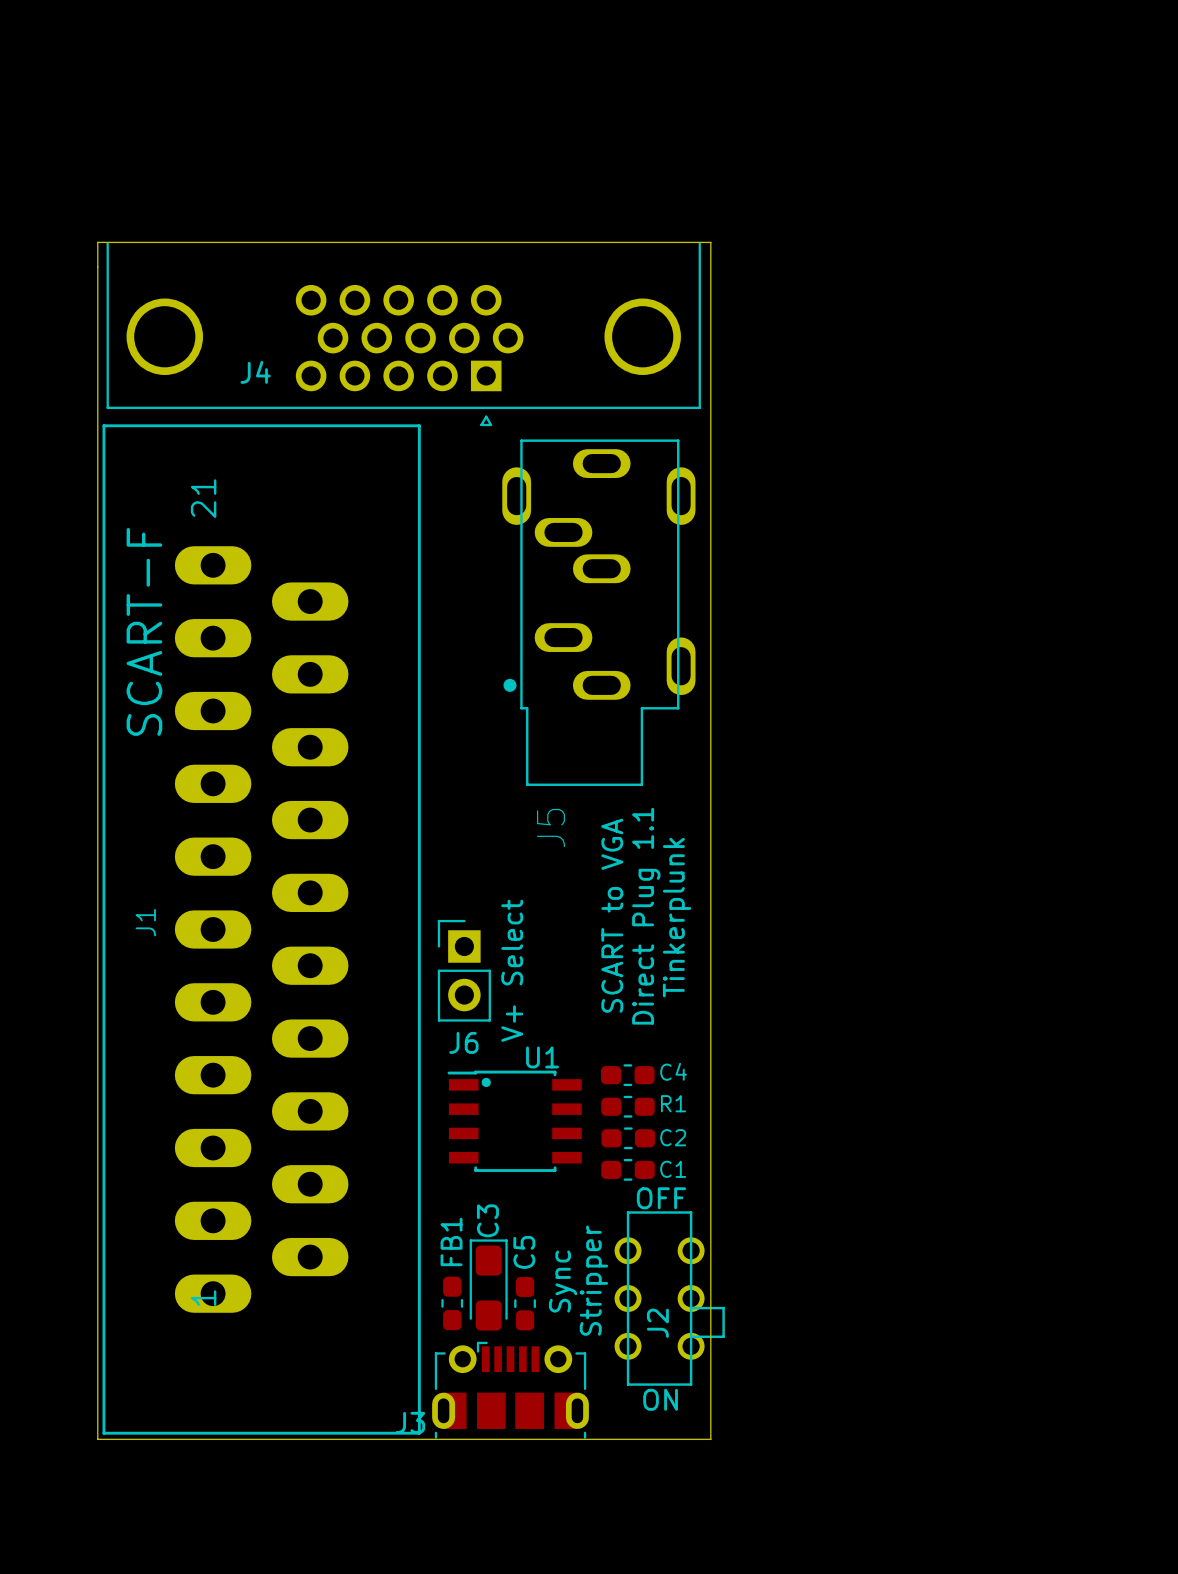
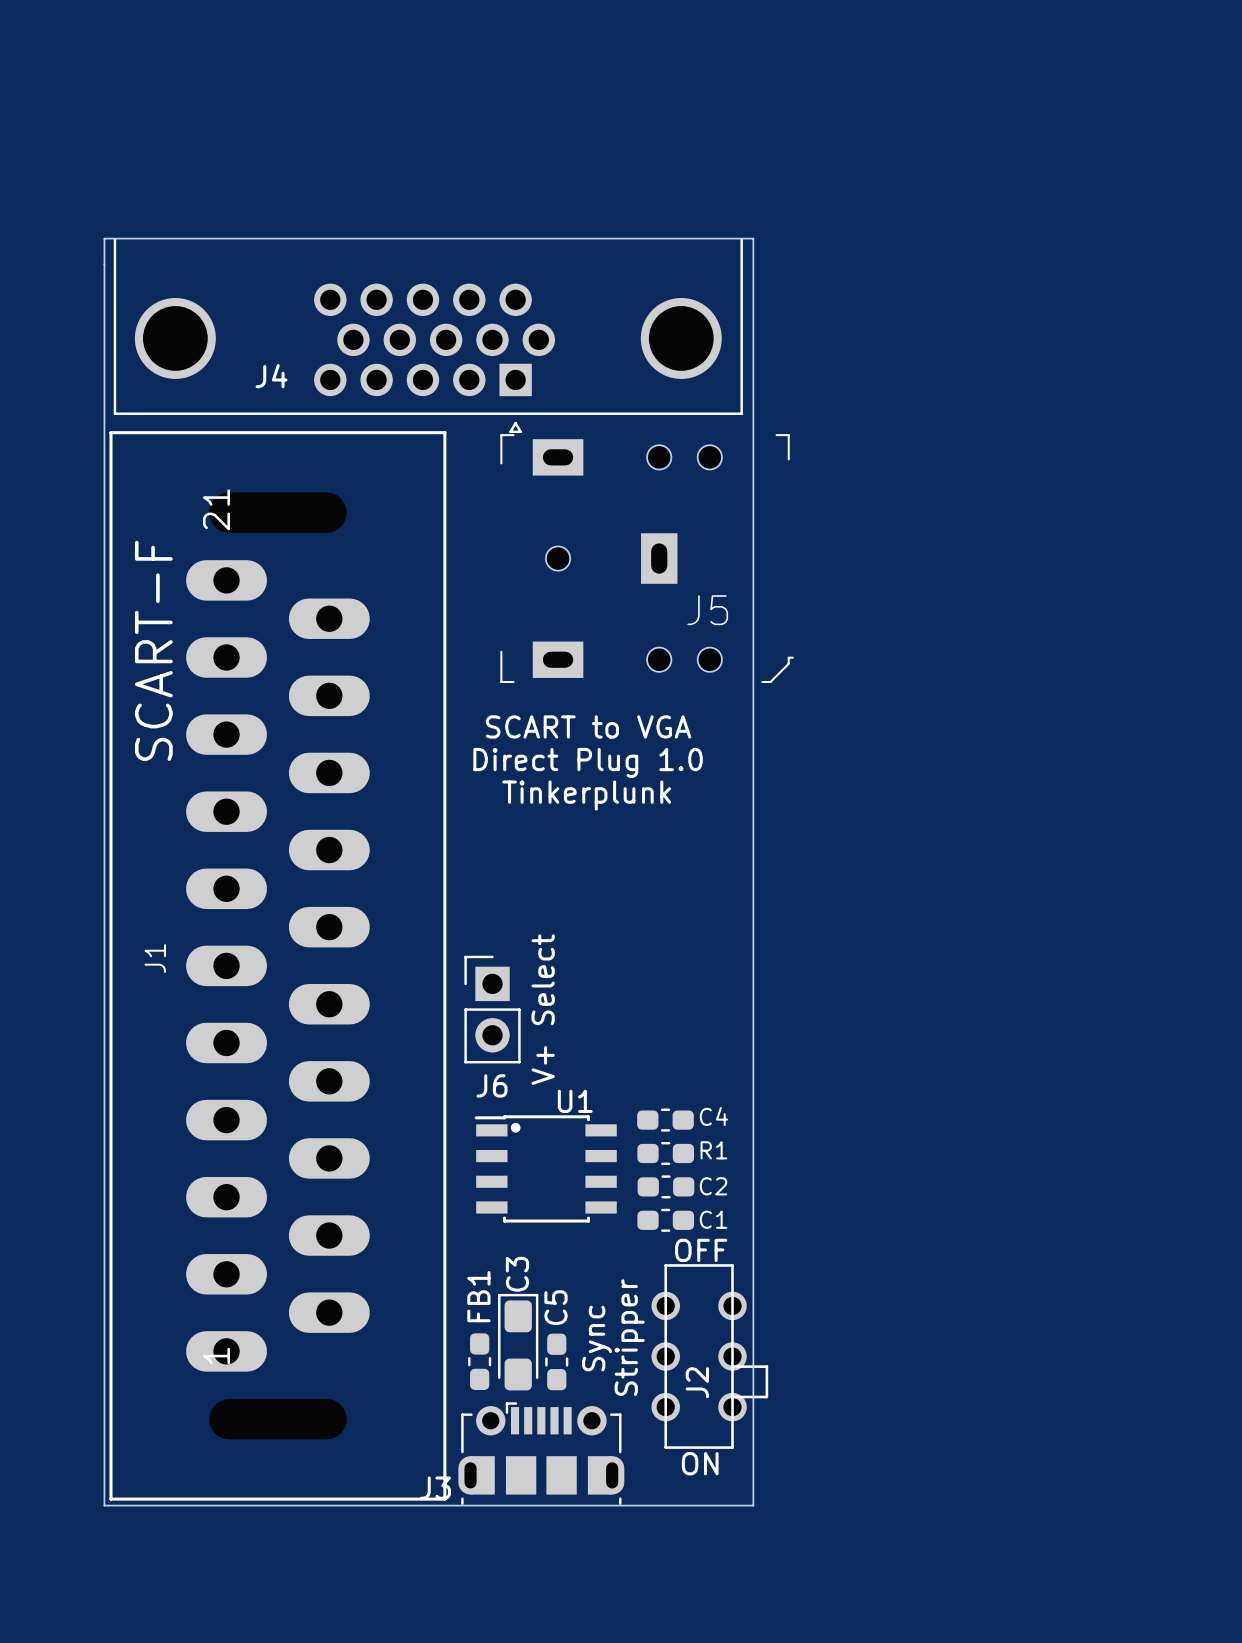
J5 footprint: [502, 439, 696, 786] -> [500, 434, 794, 684]
text: none -> Direct Plug 1.0 (588, 762)
J5 name position: J5 (550, 828) -> J5 (707, 610)
text rotation: 0° (612, 915) -> 90° clockwise (588, 726)
text: Direct Plug 1.1 (646, 916) -> none
text rotation: 0° (677, 917) -> 90° clockwise (586, 795)

